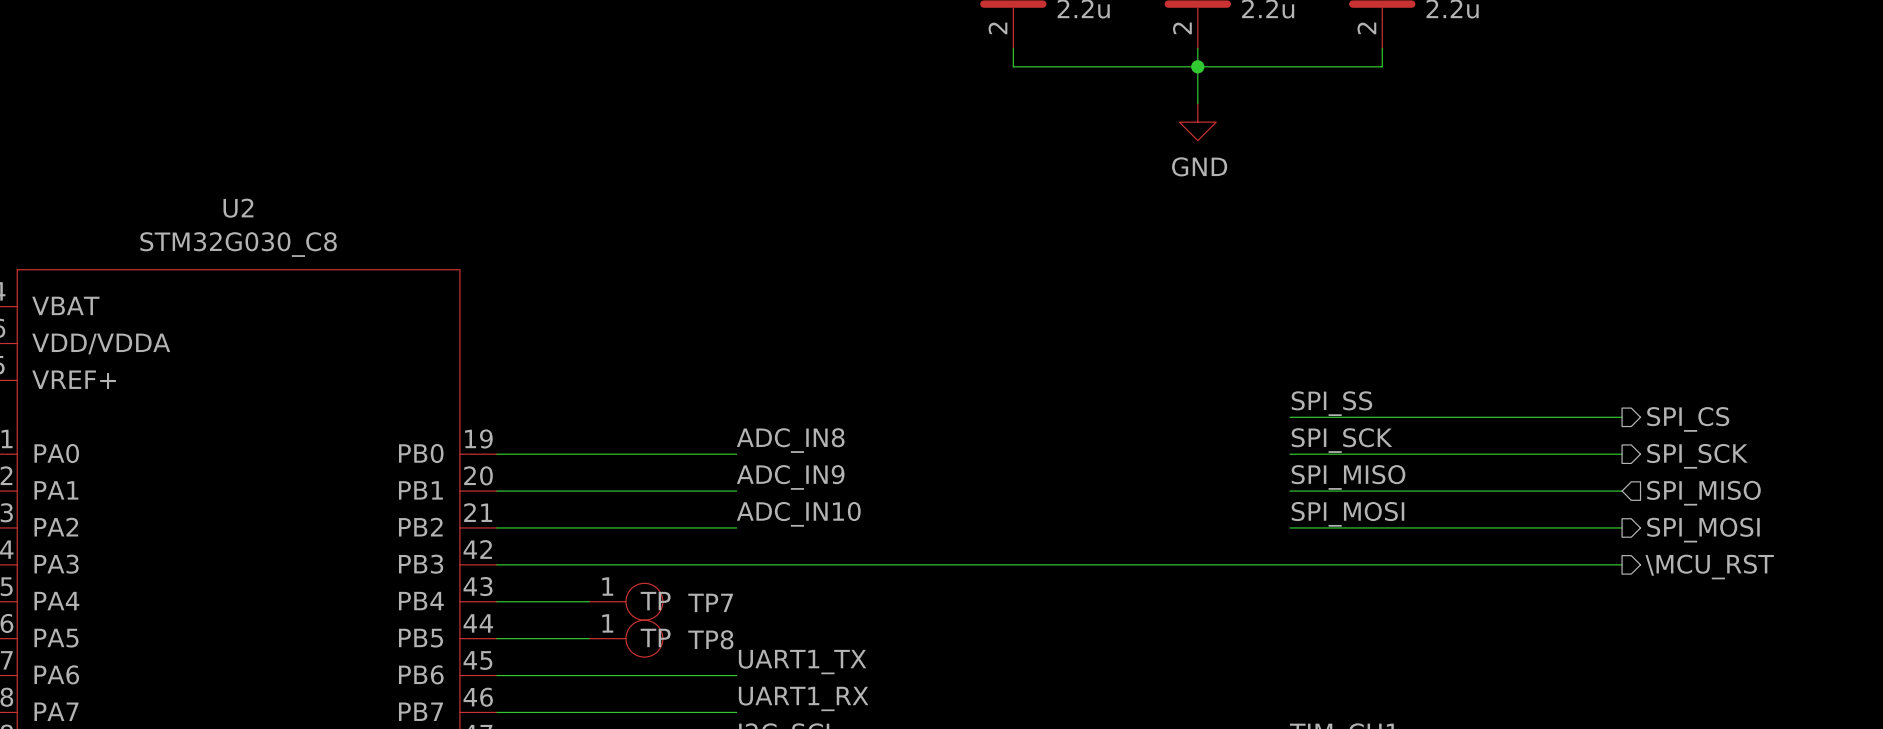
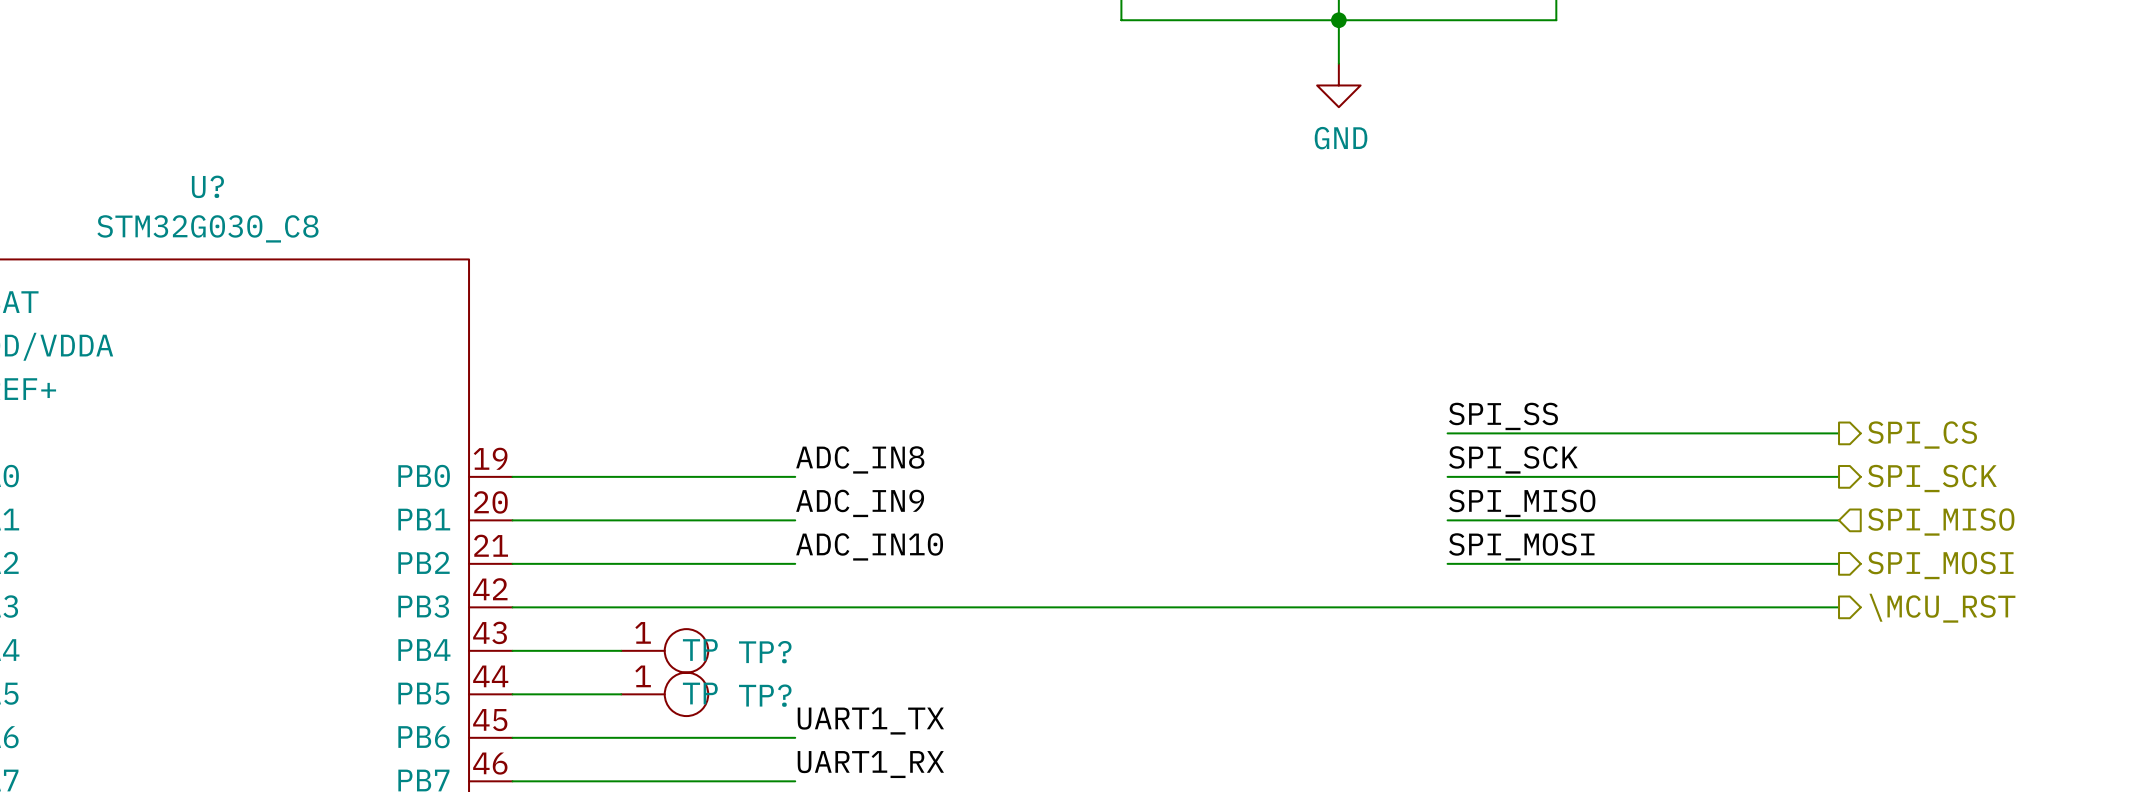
U2 name: U2 (238, 208) -> U? (207, 186)
TP7 name: TP7 (710, 602) -> TP? (765, 652)
TP8 name: TP8 (710, 639) -> TP? (765, 695)

